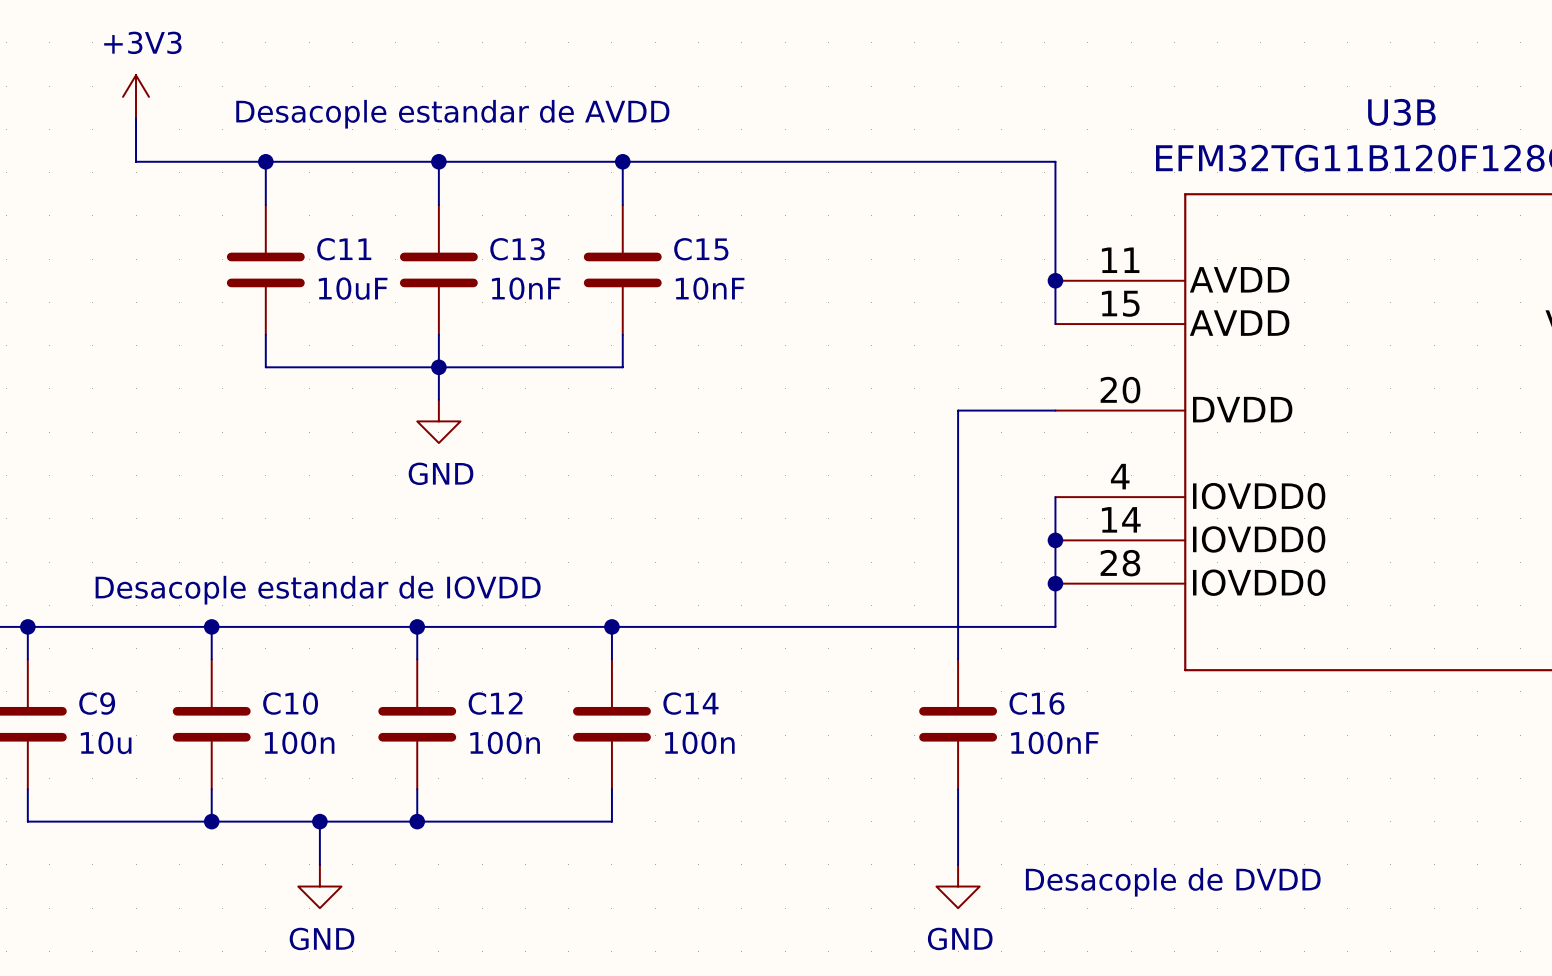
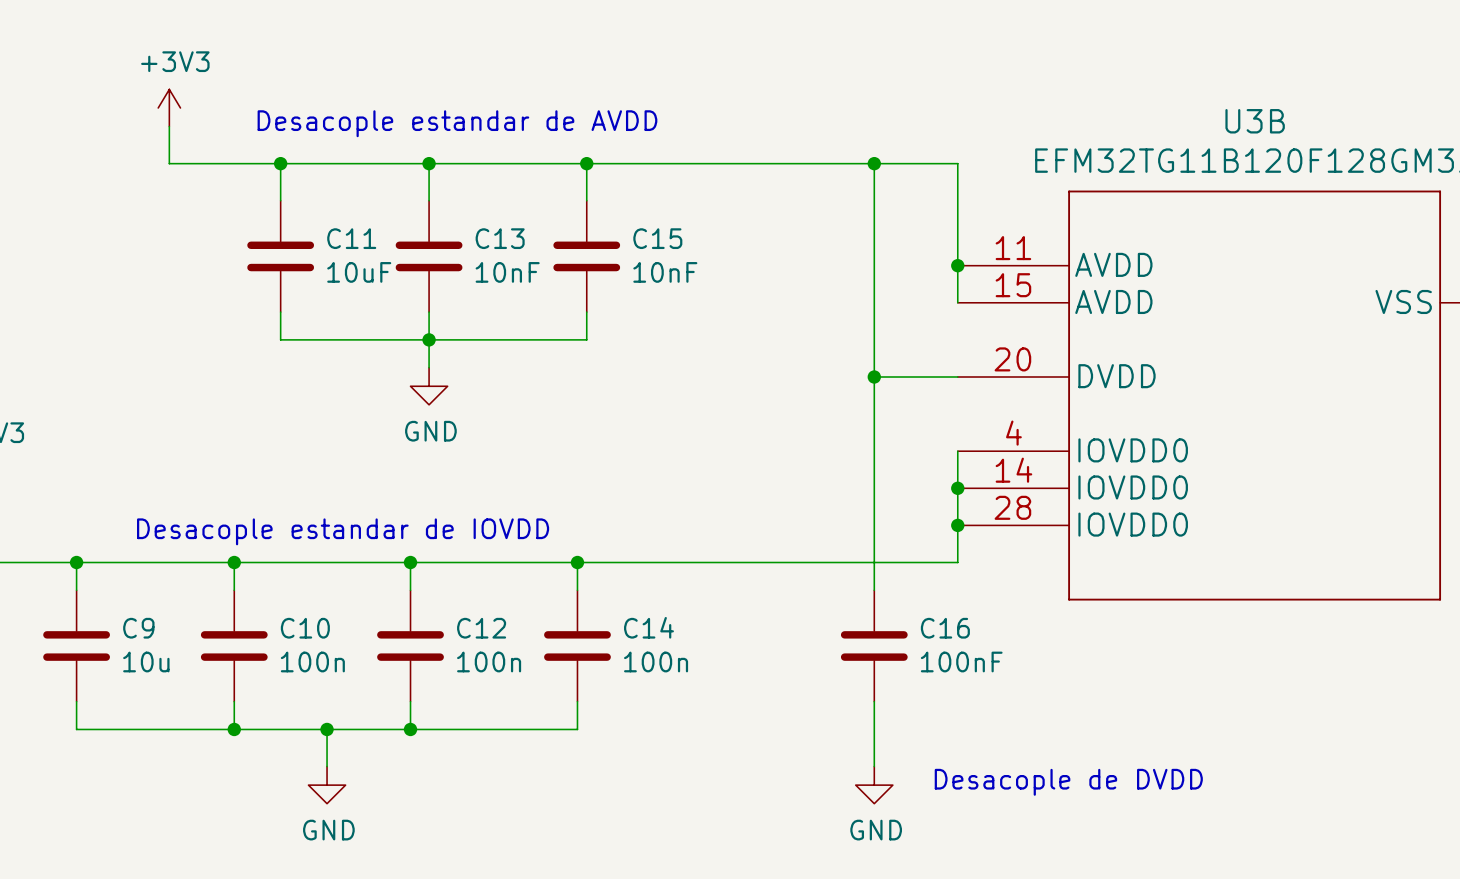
wire: none -> (874, 163) (874, 376)
junction: none -> (874, 163)
junction: none -> (874, 376)

